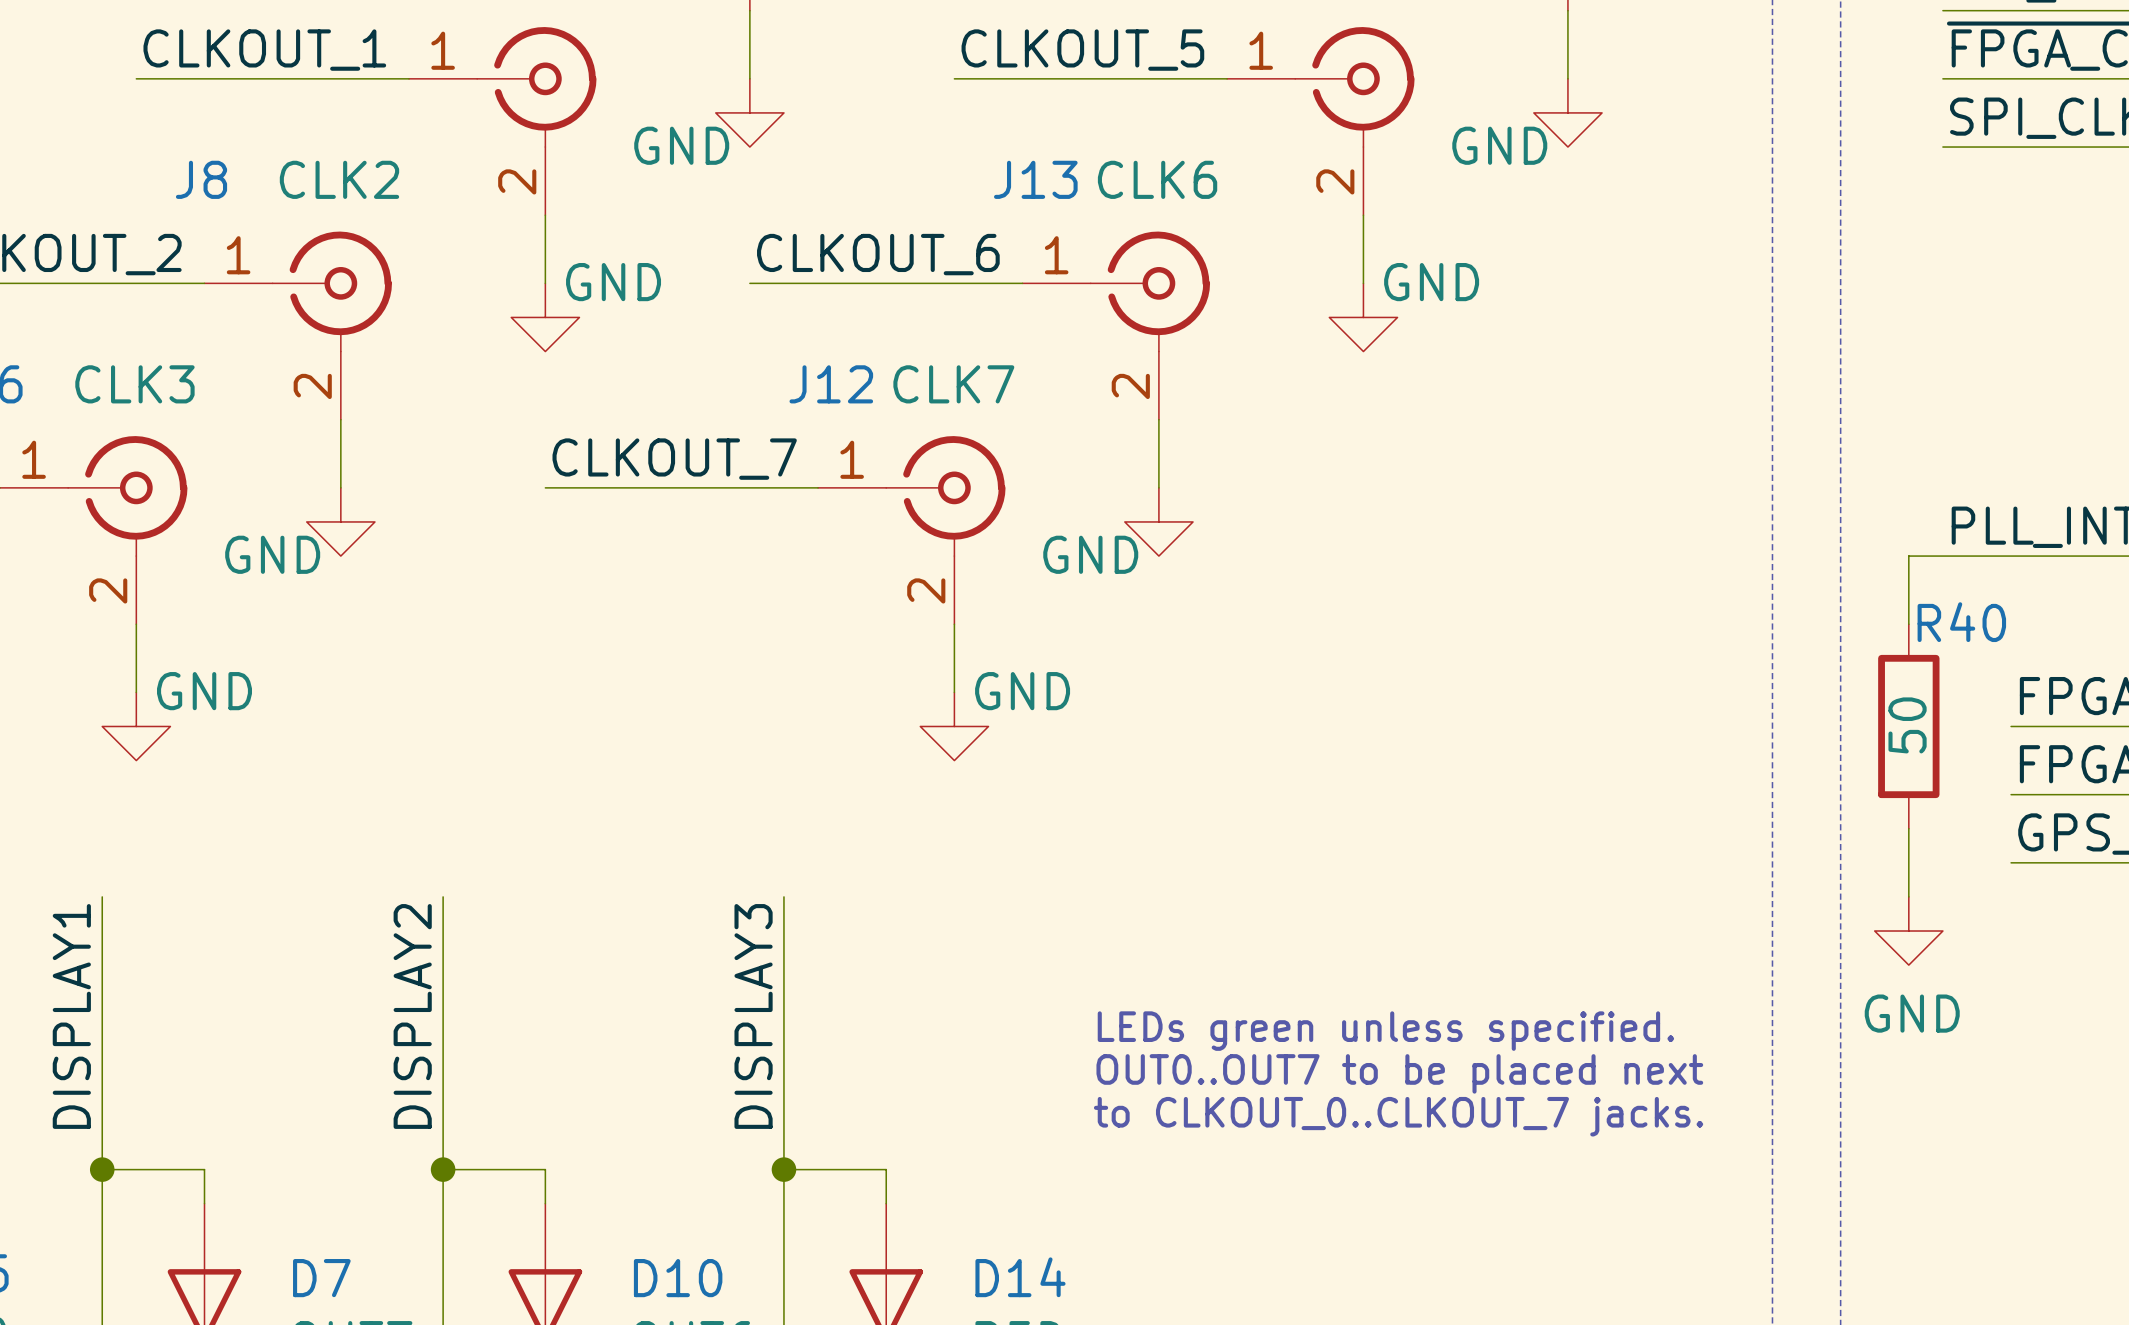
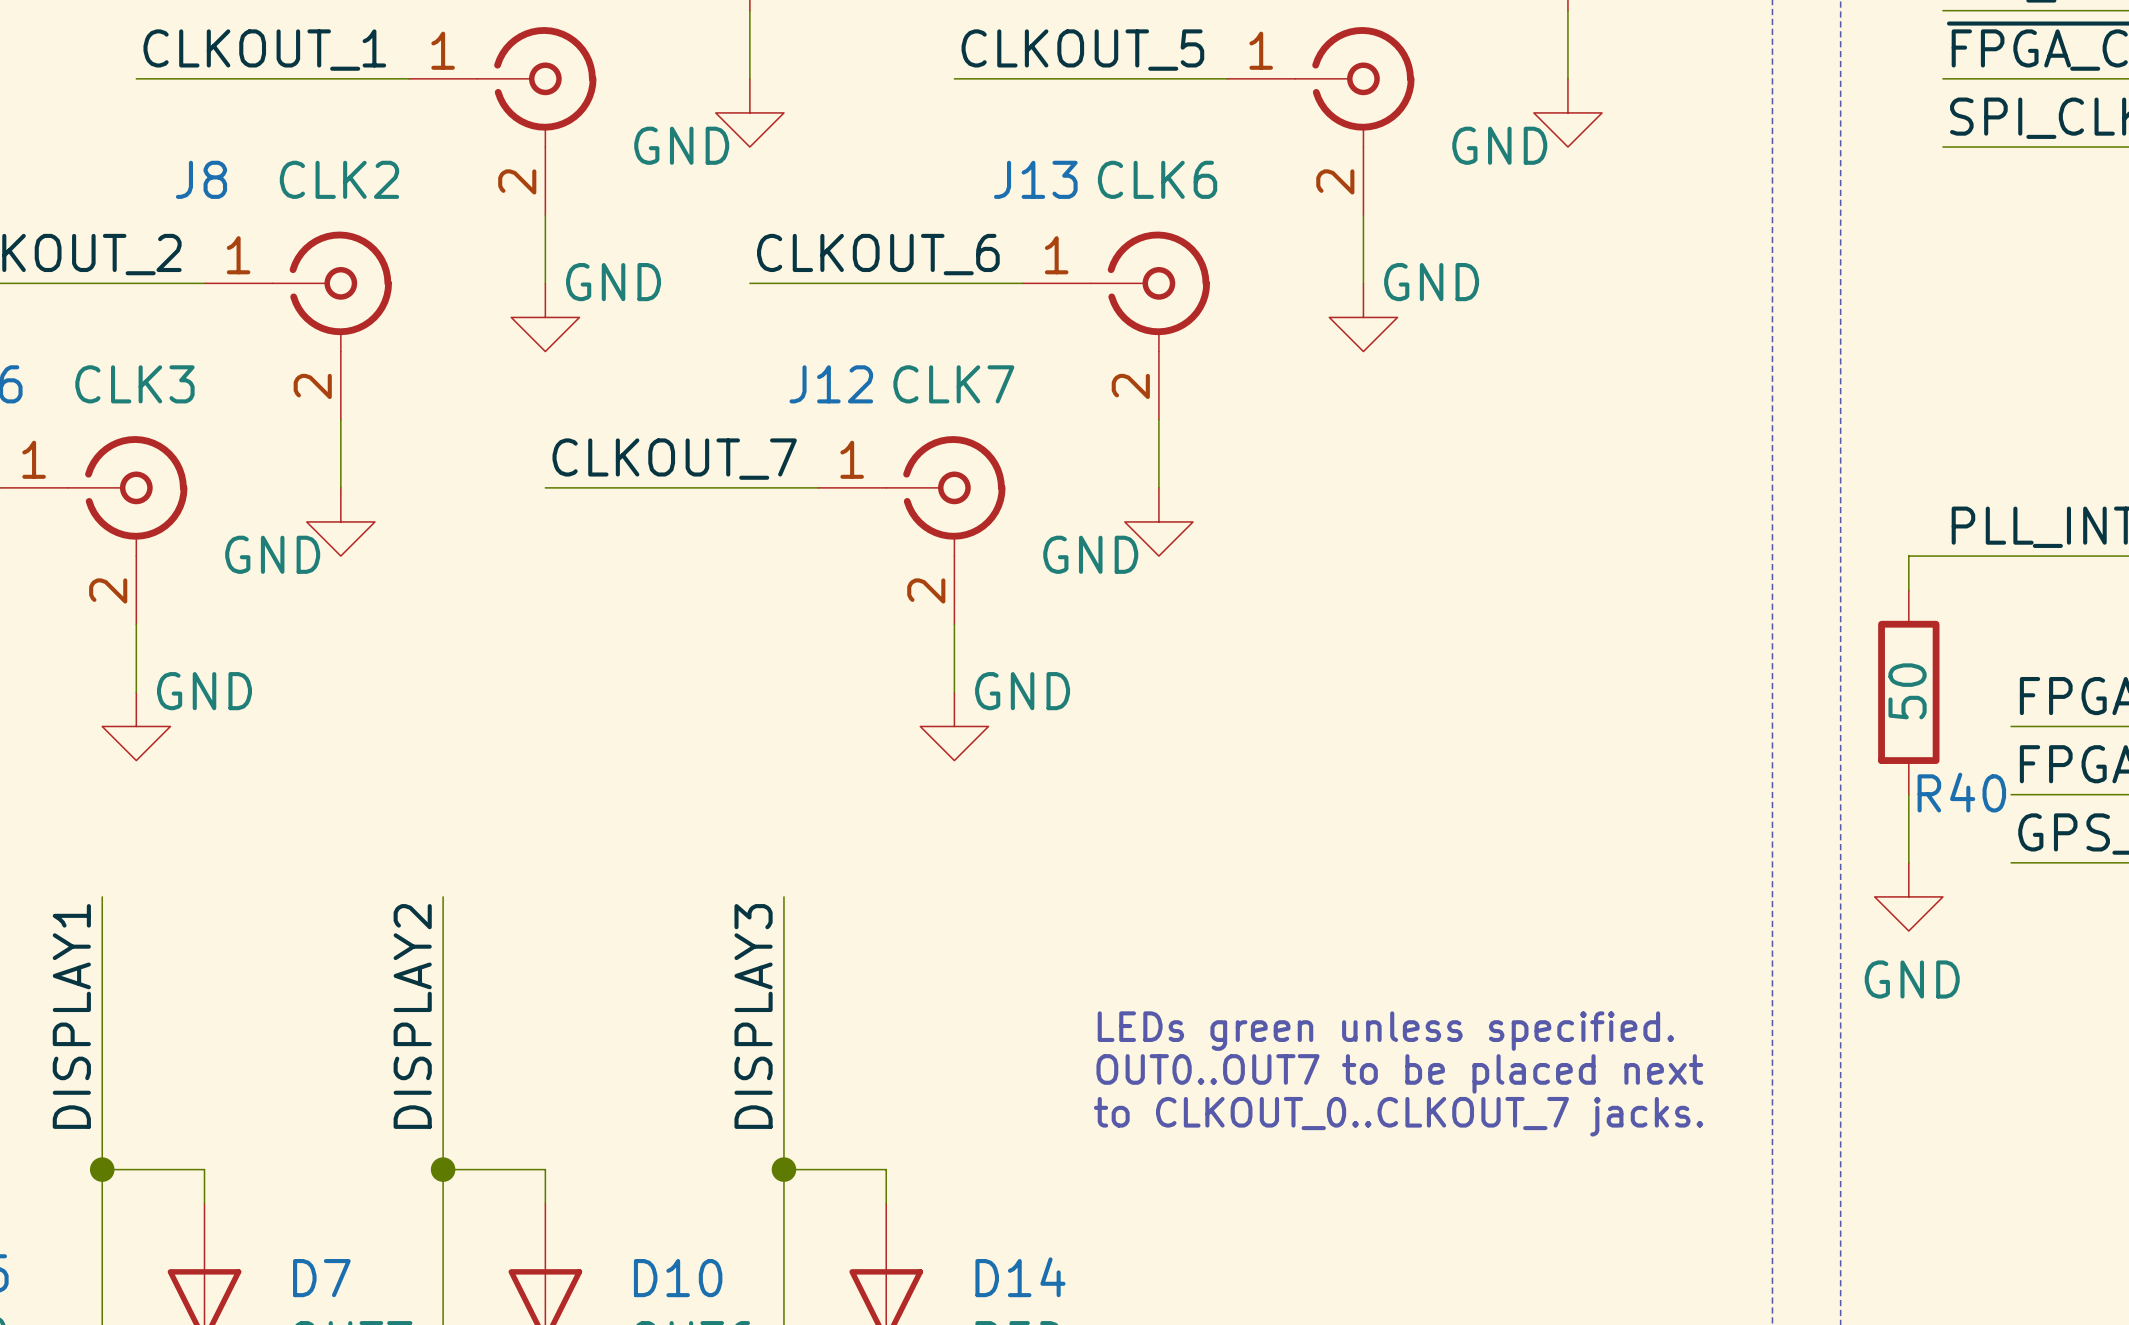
R40 name position: R40 (1961, 622) -> R40 (1961, 792)
R40 position: (1908, 726) -> (1908, 692)
power symbol position: GND (1908, 931) -> GND (1908, 896)

